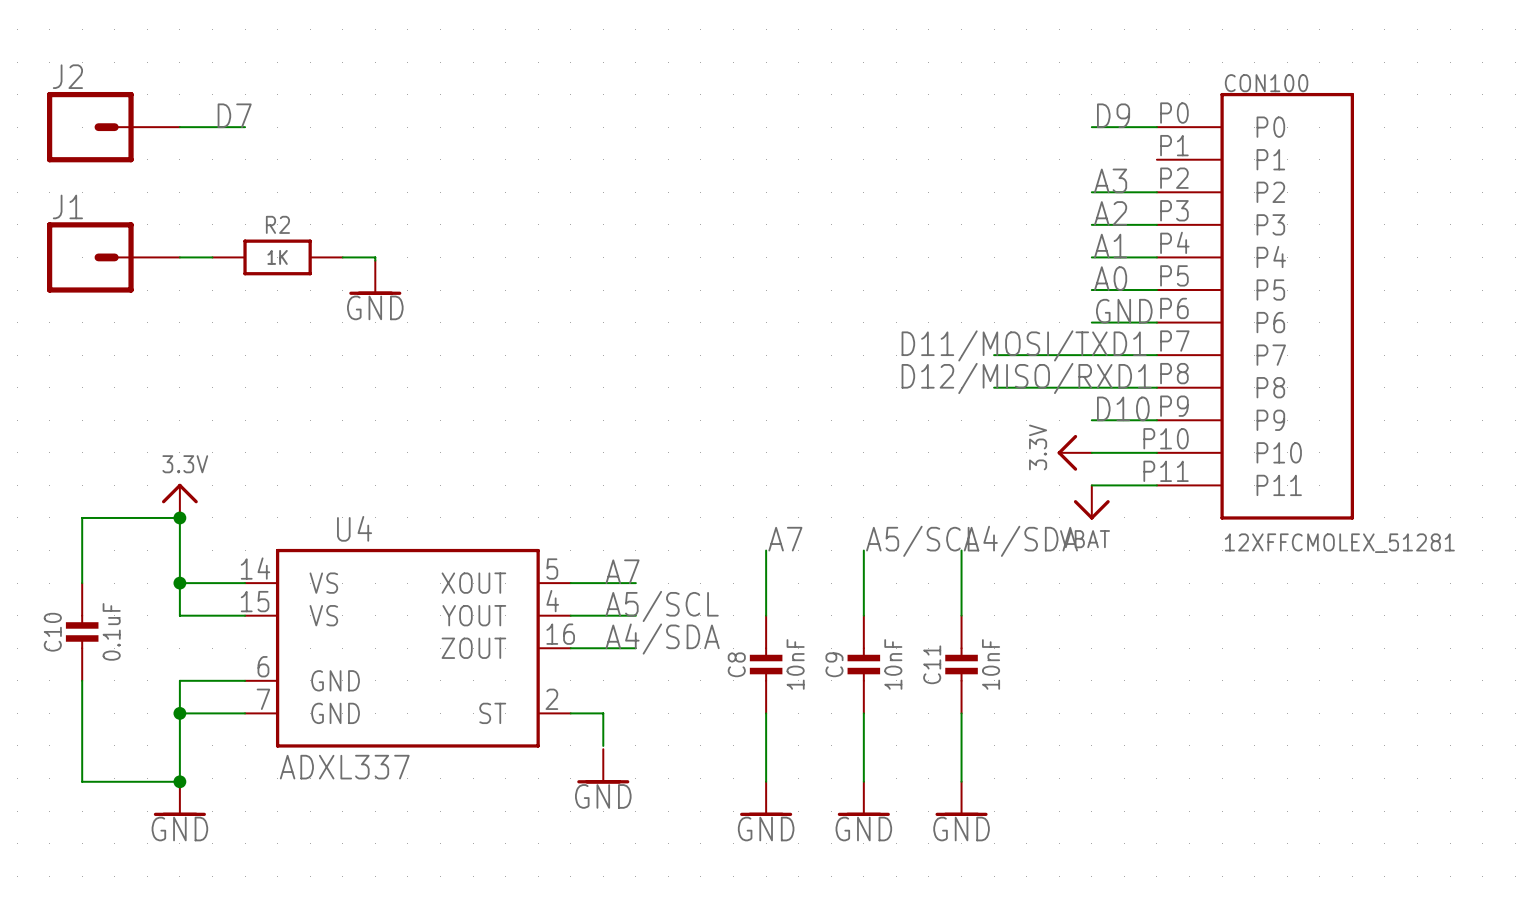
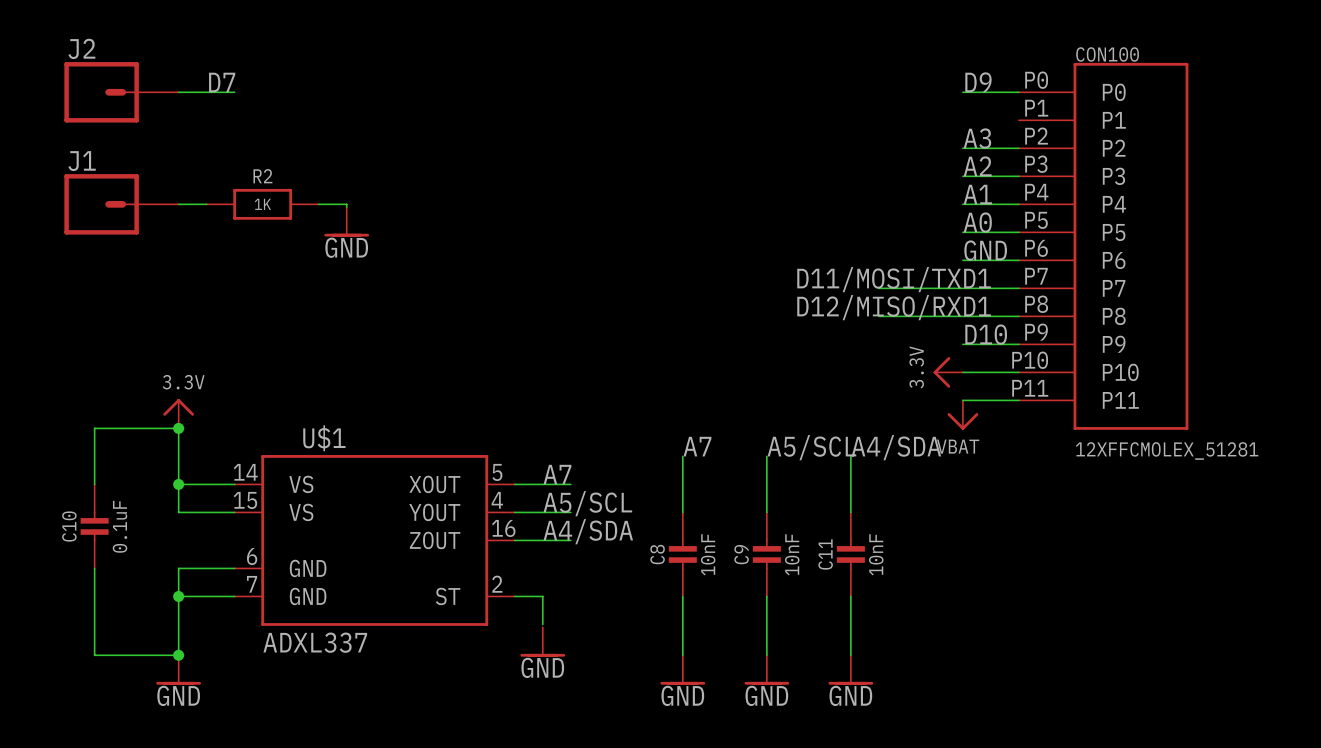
U4 name: U4 (354, 528) -> U$1 (324, 438)

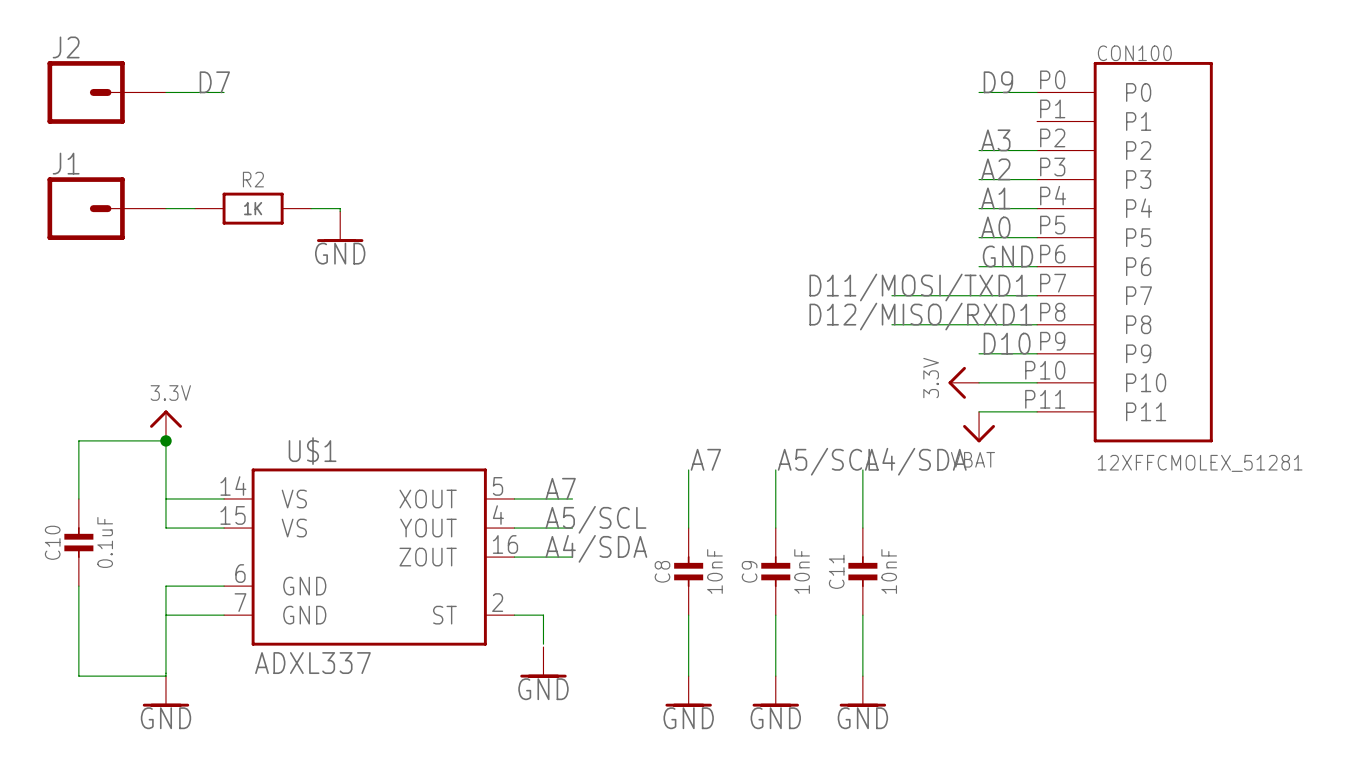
junction: (178, 484) -> none
junction: (178, 596) -> none
junction: (178, 655) -> none

